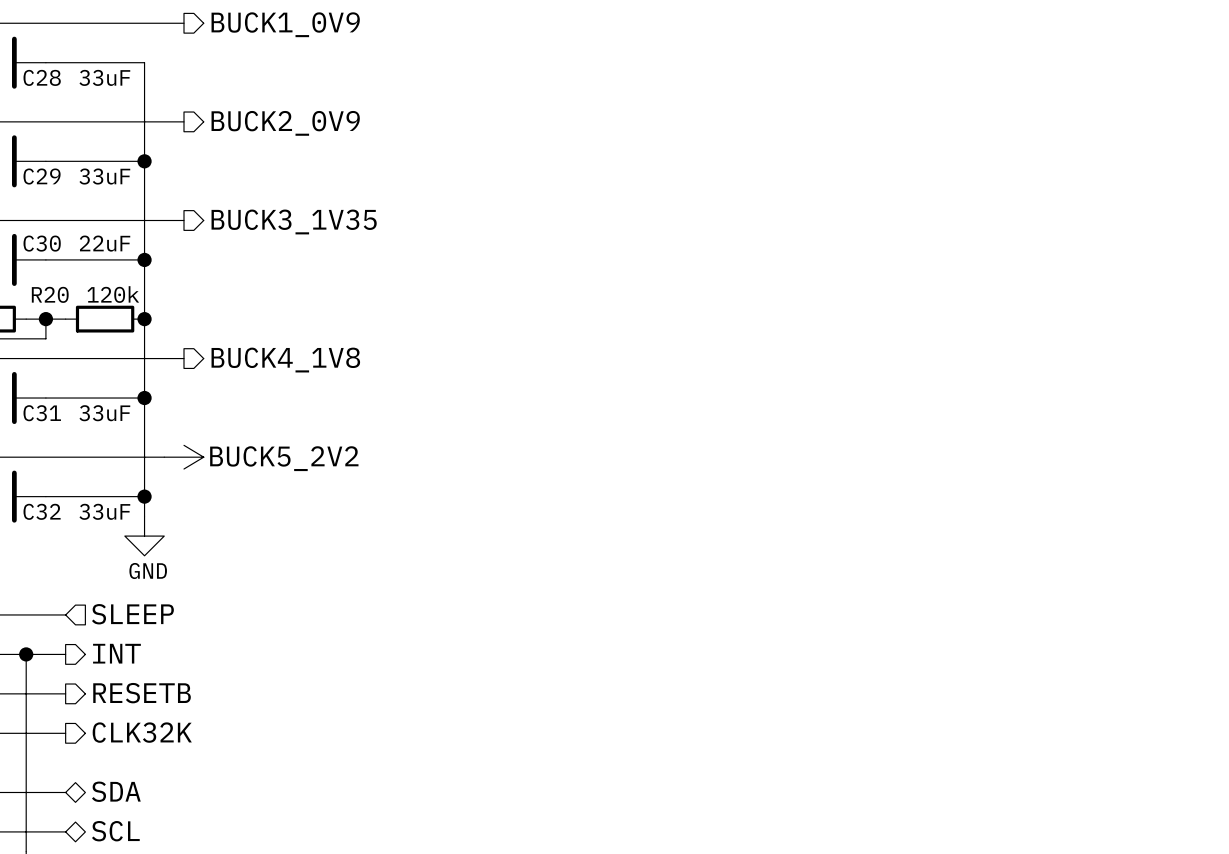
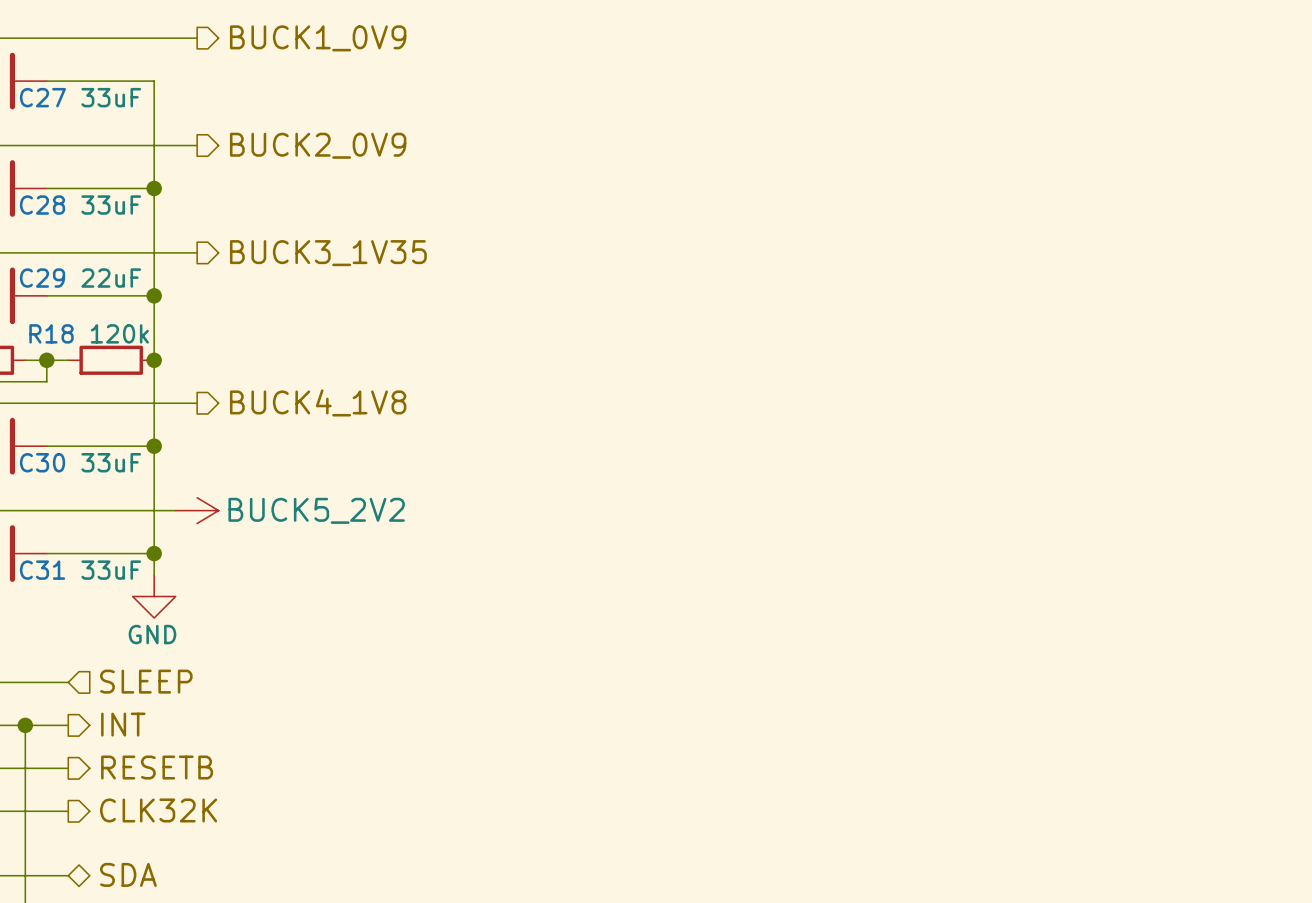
C28 name: C28 (42, 77) -> C27 (42, 97)
C29 name: C29 (42, 176) -> C28 (42, 205)
C30 name: C30 (42, 243) -> C29 (42, 278)
R20 name: R20 (50, 294) -> R18 (51, 333)
C31 name: C31 (42, 413) -> C30 (42, 462)
C32 name: C32 (42, 511) -> C31 (42, 570)

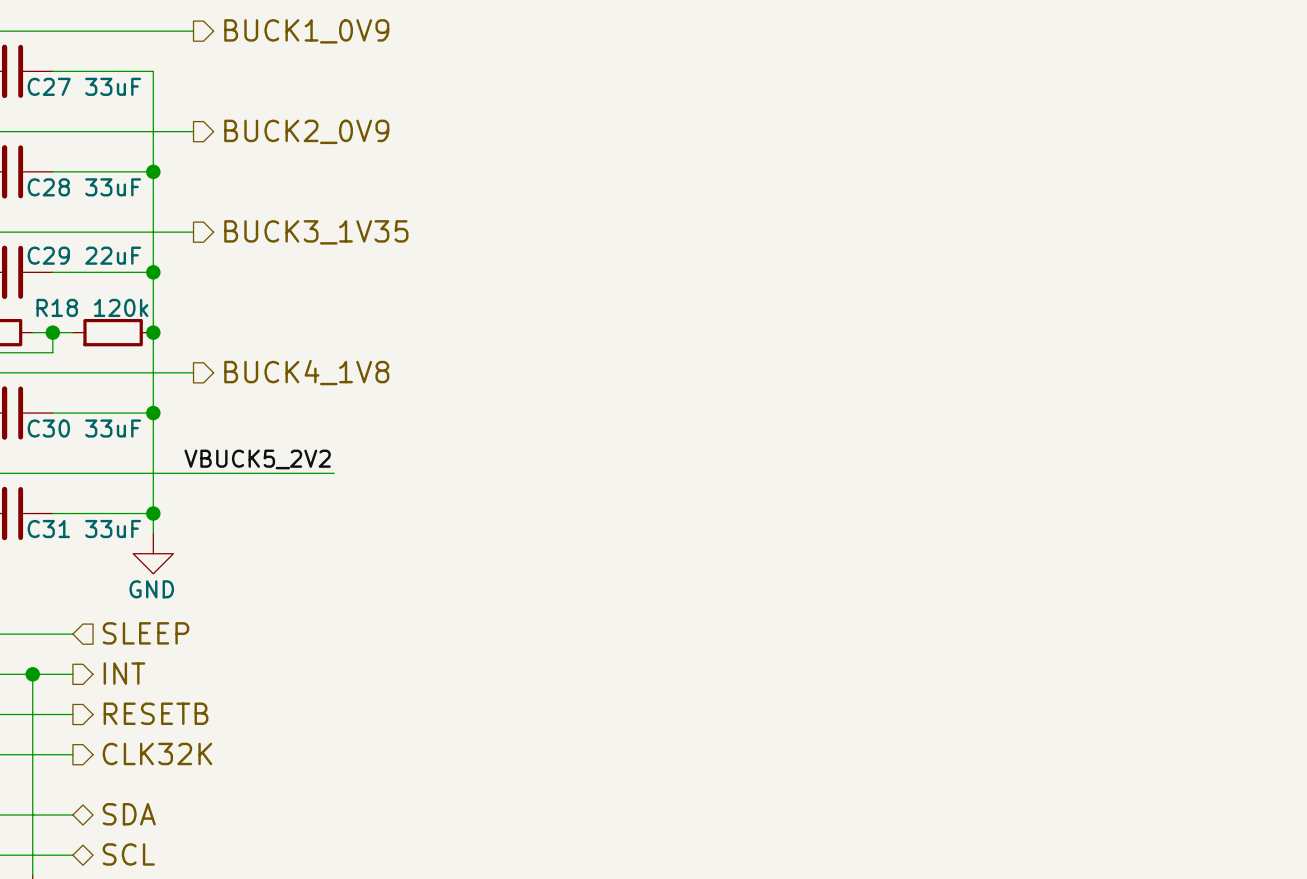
label: none -> VBUCK5_2V2 (257, 459)
wire: none -> (173, 473) (334, 473)
power symbol: BUCK5_2V2 (197, 510) -> none

